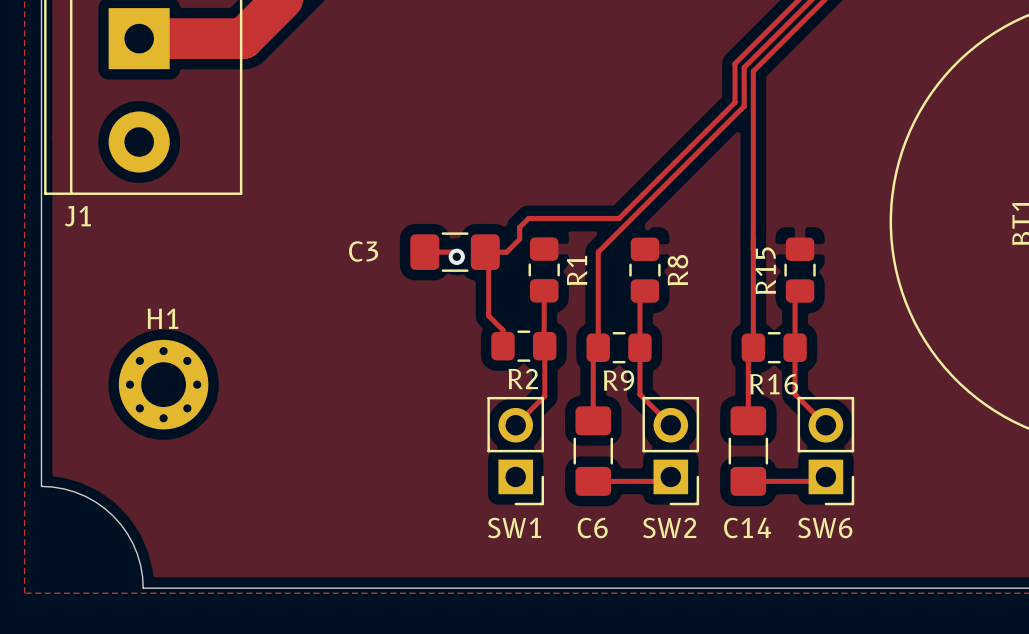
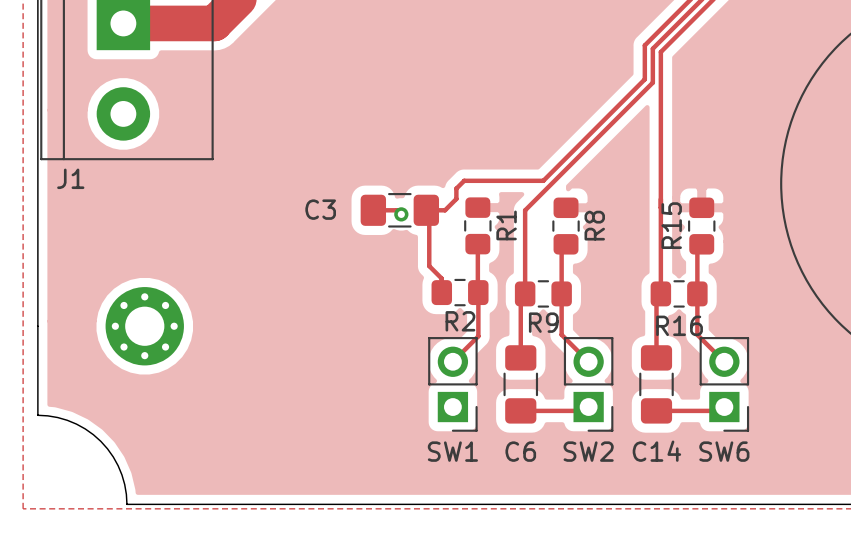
H1 name: H1 (162, 318) -> none

